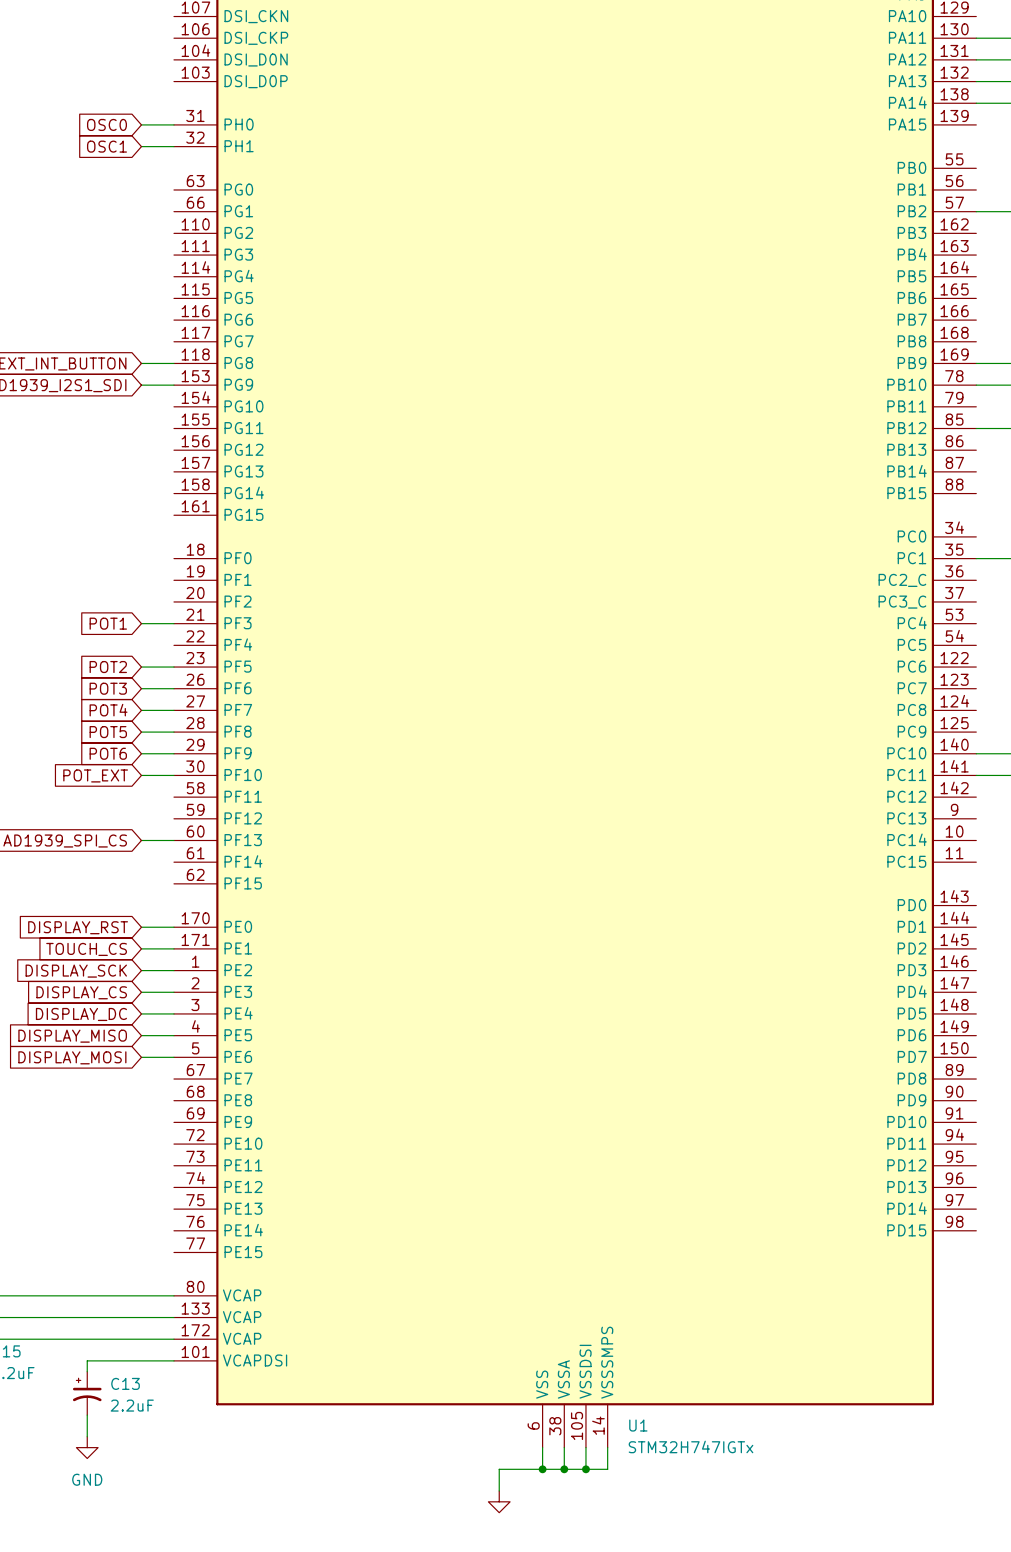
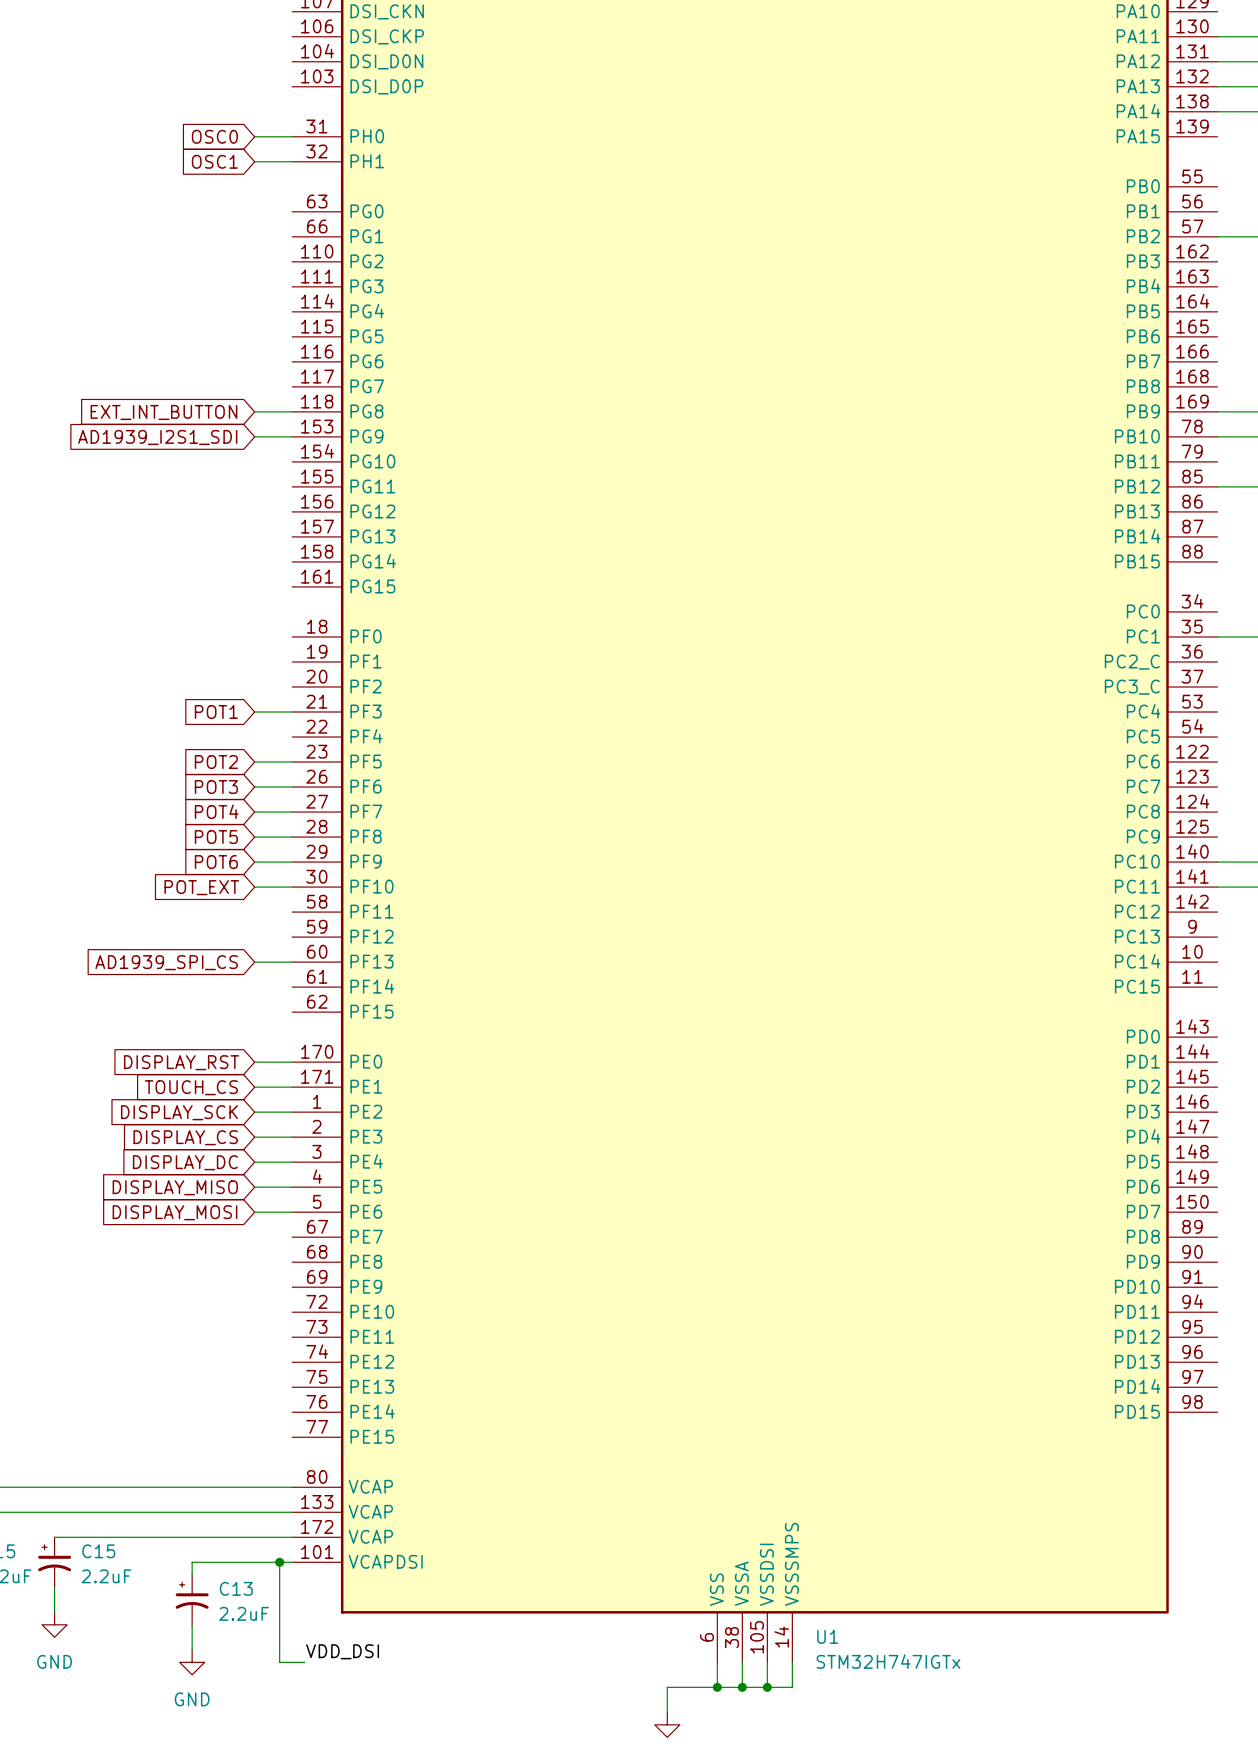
wire: none -> (279, 1562) (279, 1662) (304, 1662)
junction: none -> (279, 1562)
label: none -> VDD_DSI (342, 1651)

